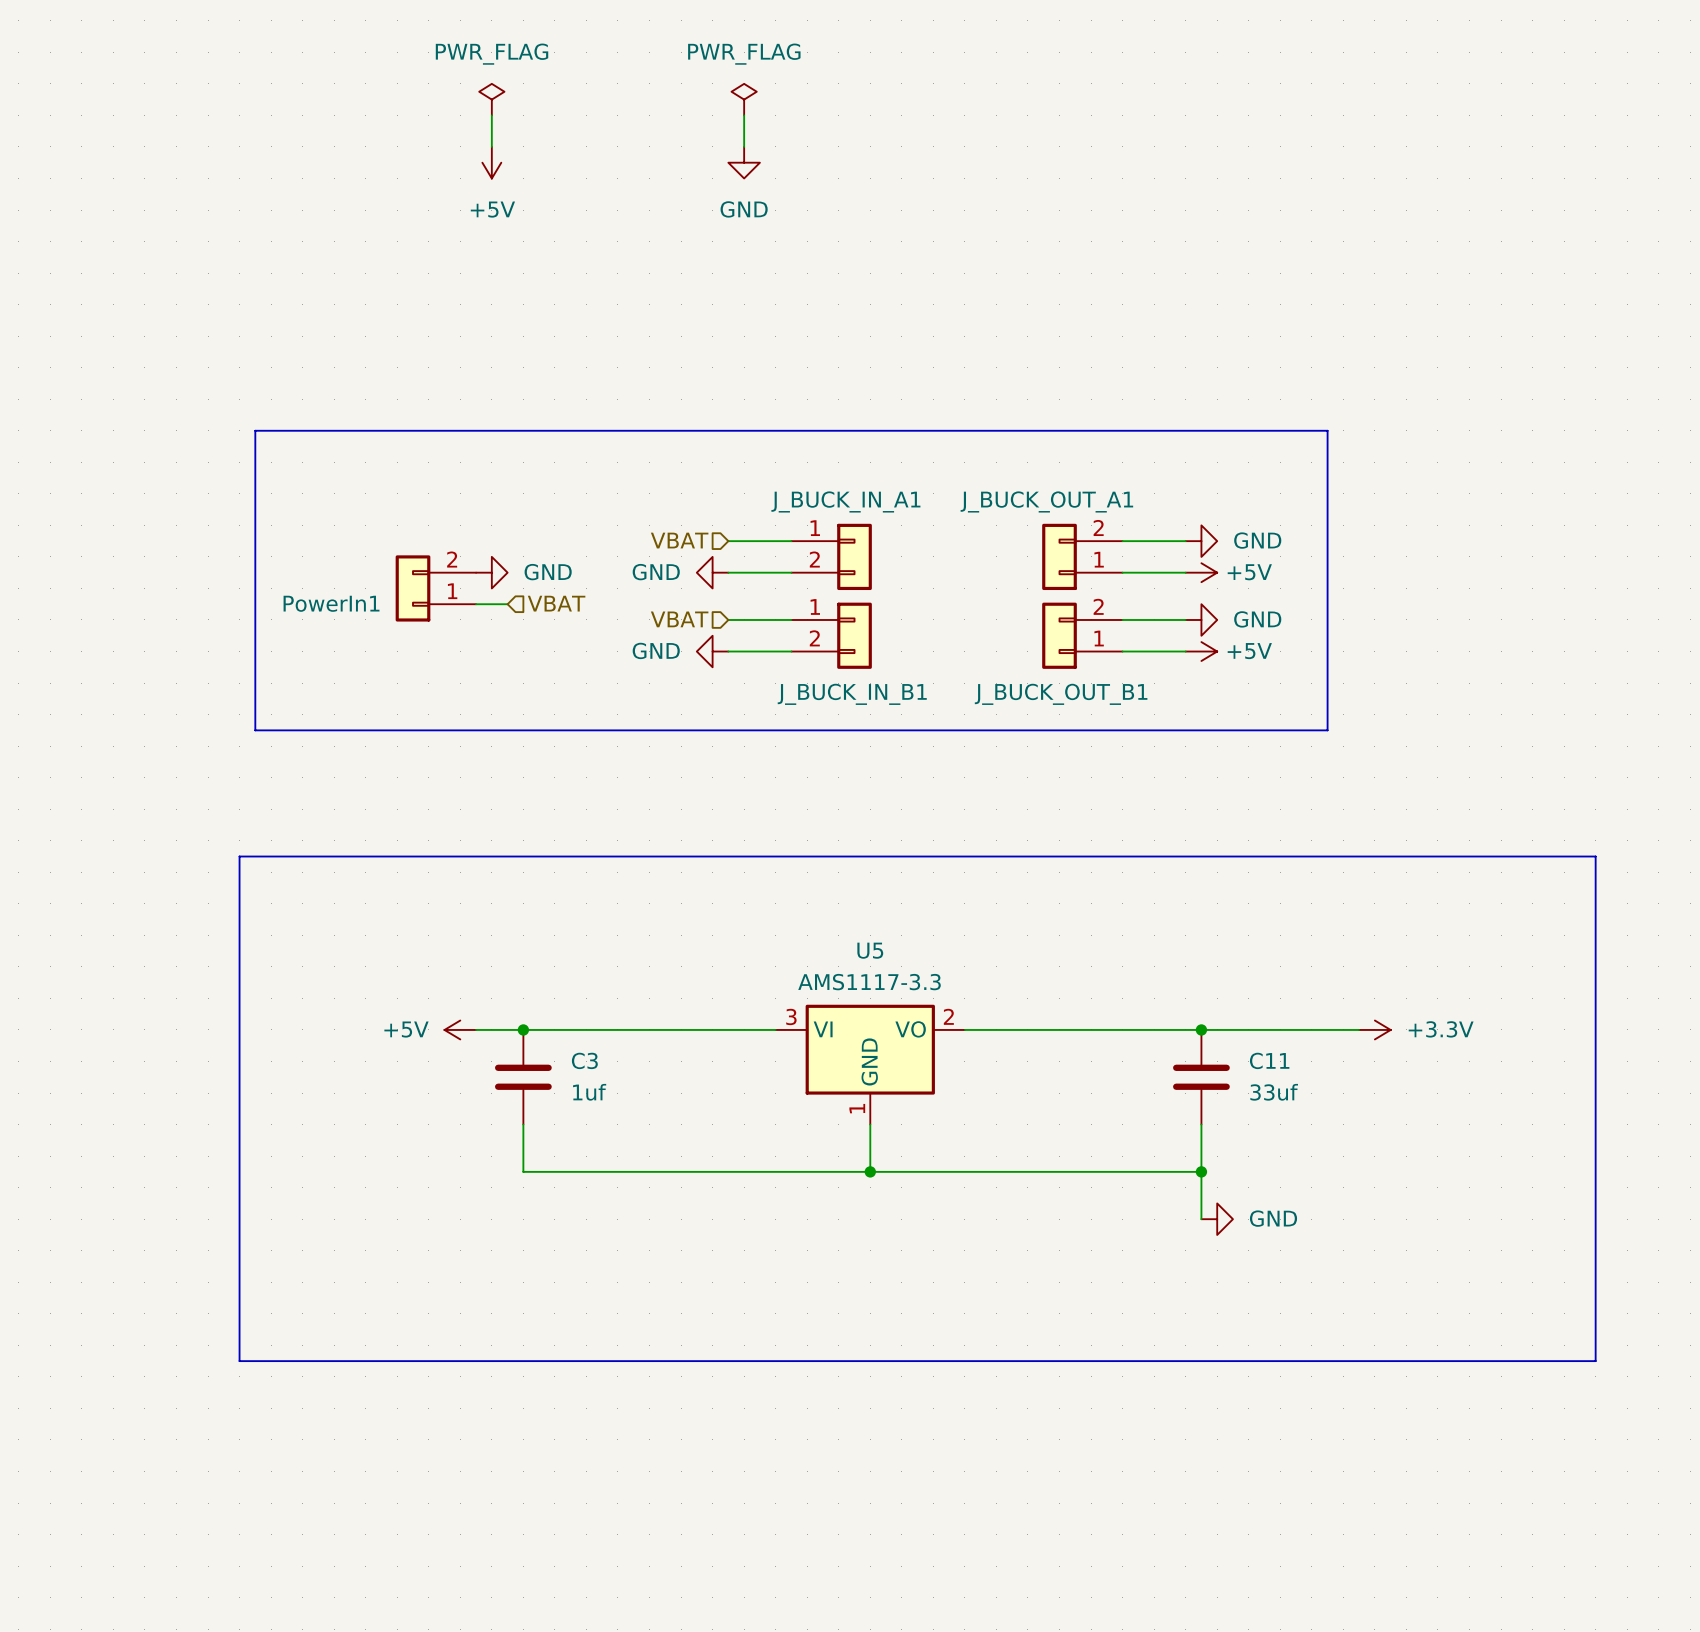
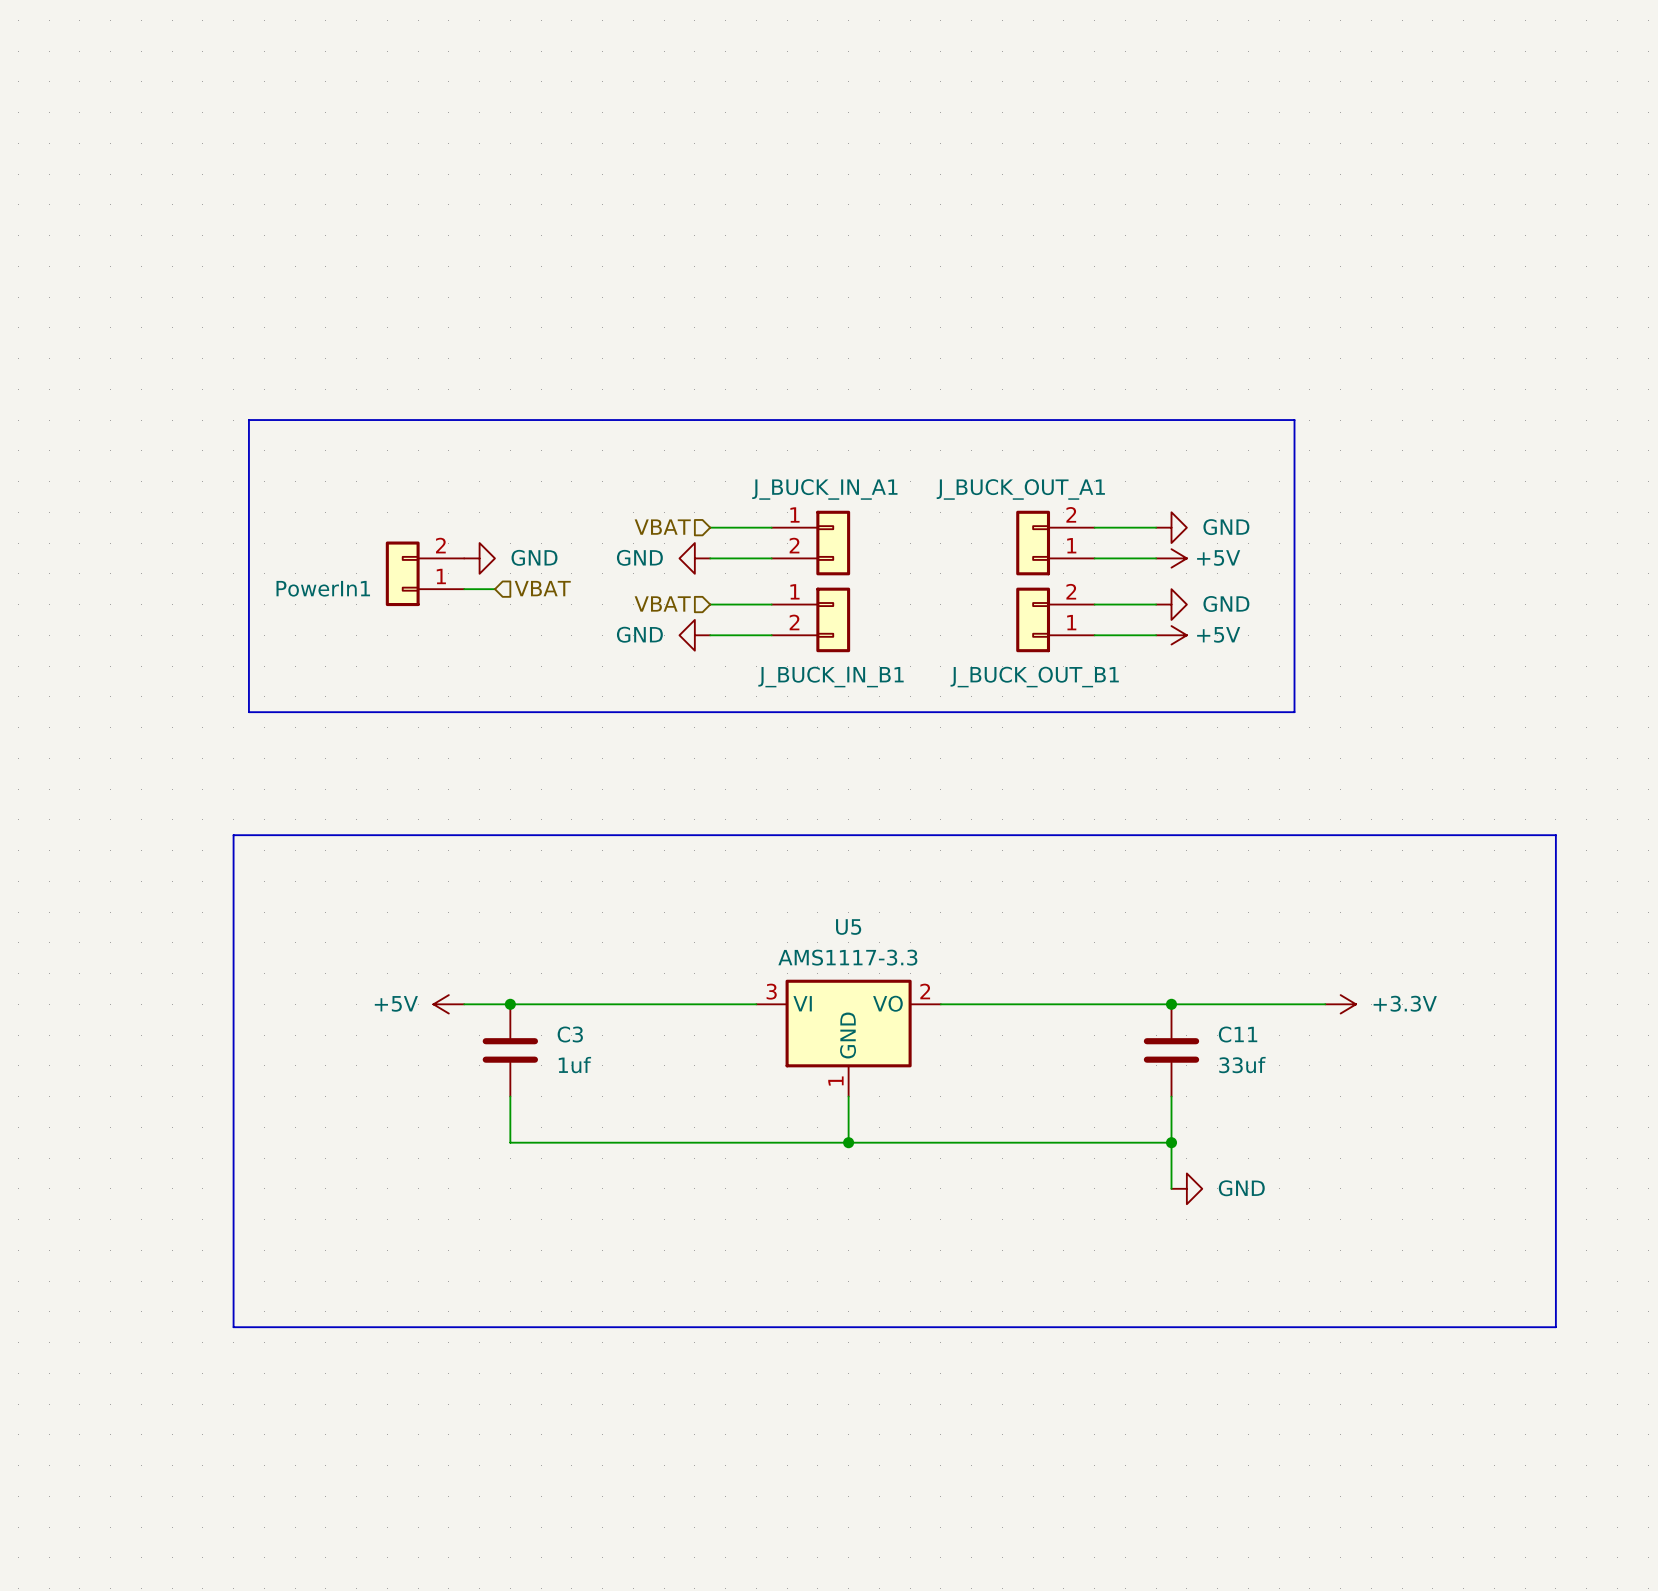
power symbol: PWR_FLAG (491, 99) -> none
power symbol: PWR_FLAG (744, 99) -> none
wire: (491, 115) (491, 146) -> none
wire: (744, 115) (744, 146) -> none
power symbol: +5V (491, 162) -> none
power symbol: GND (744, 162) -> none

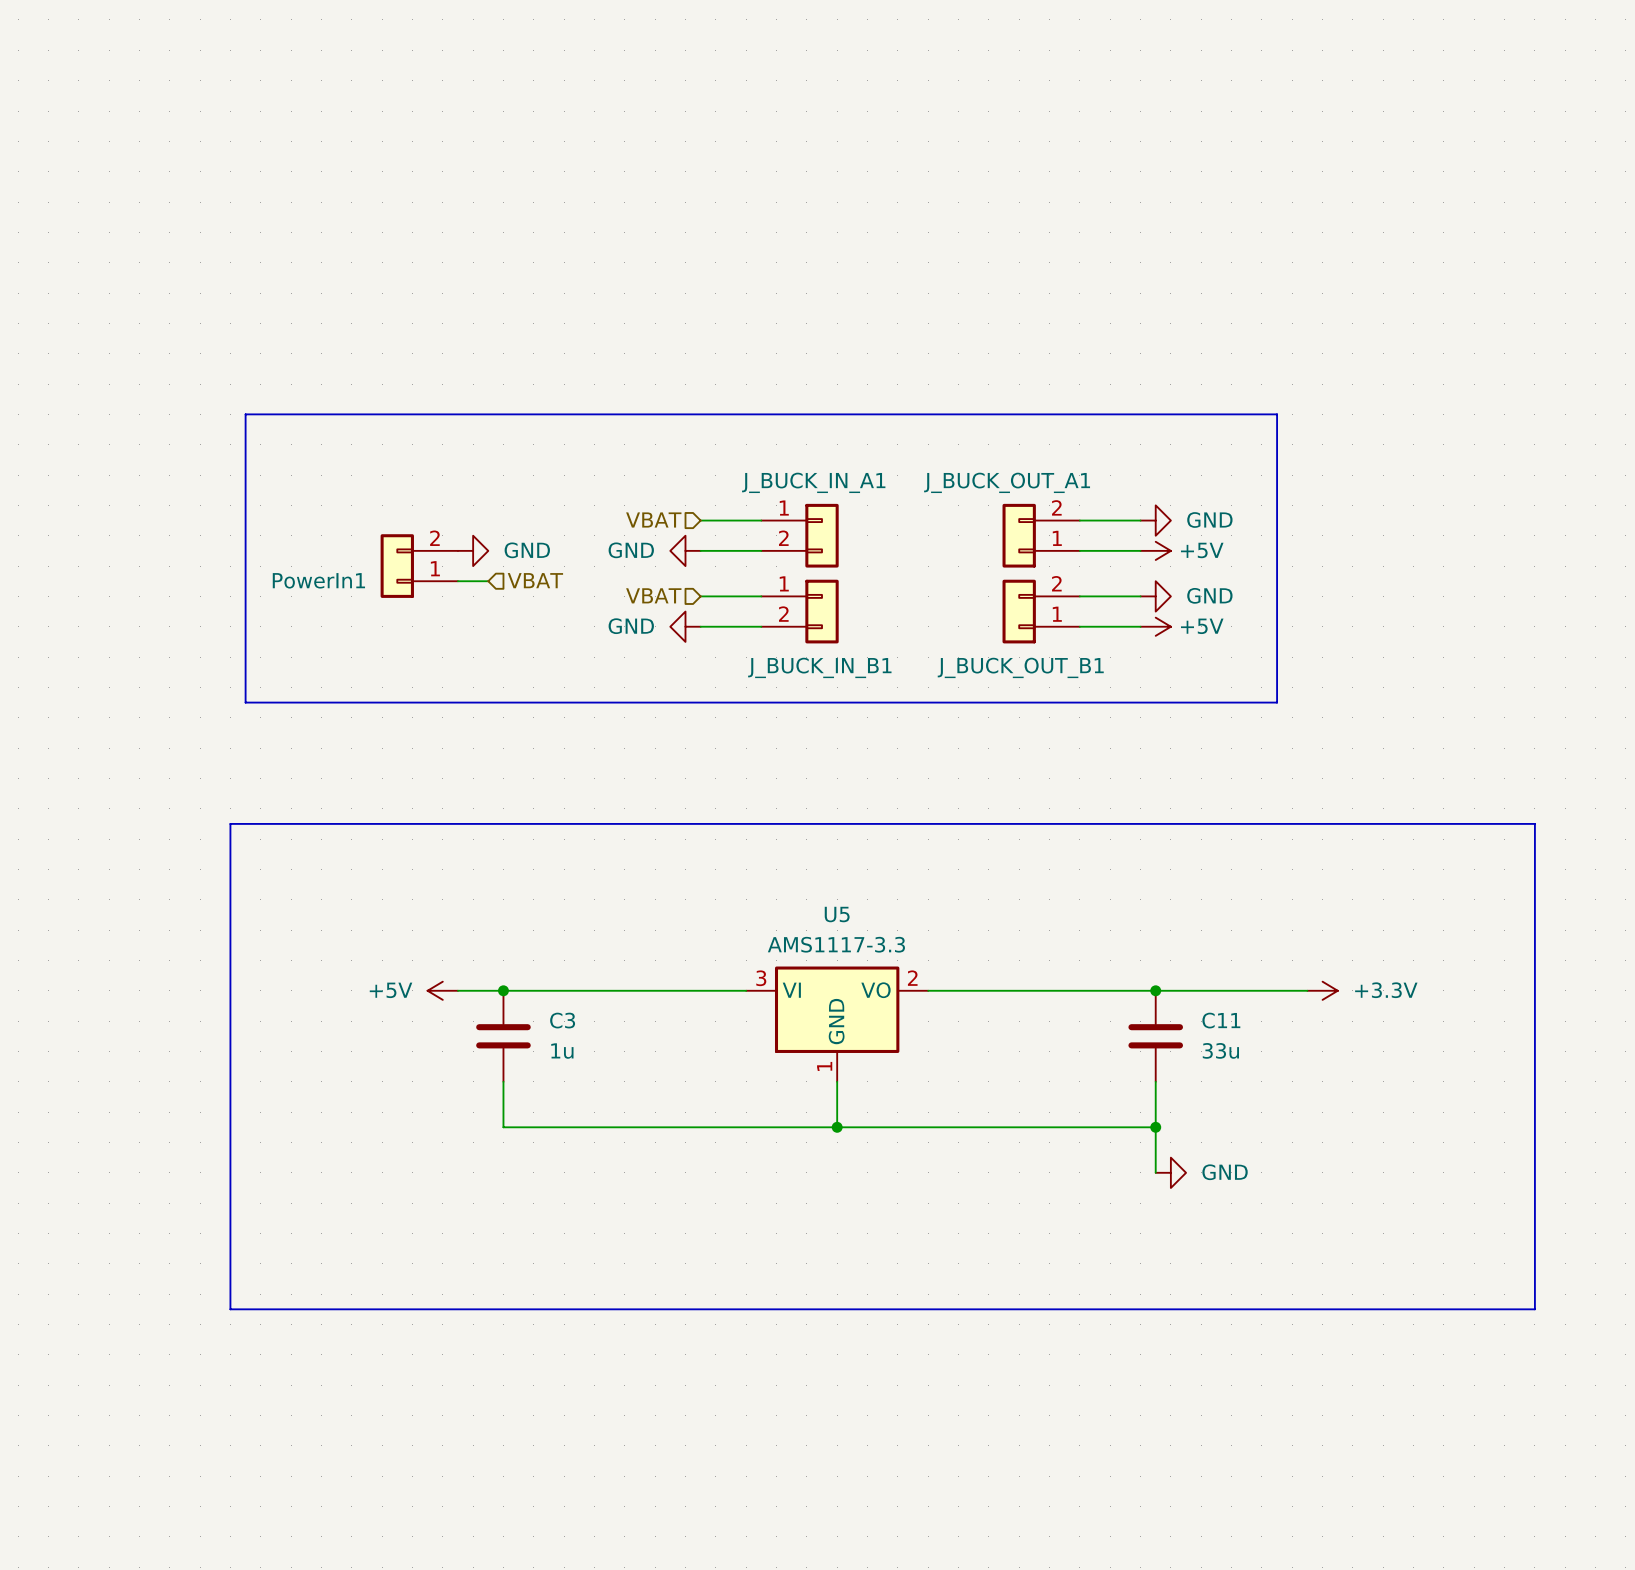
C3 value: 1uf (574, 1065) -> 1u (562, 1051)
C11 value: 33uf (1242, 1065) -> 33u (1220, 1050)

